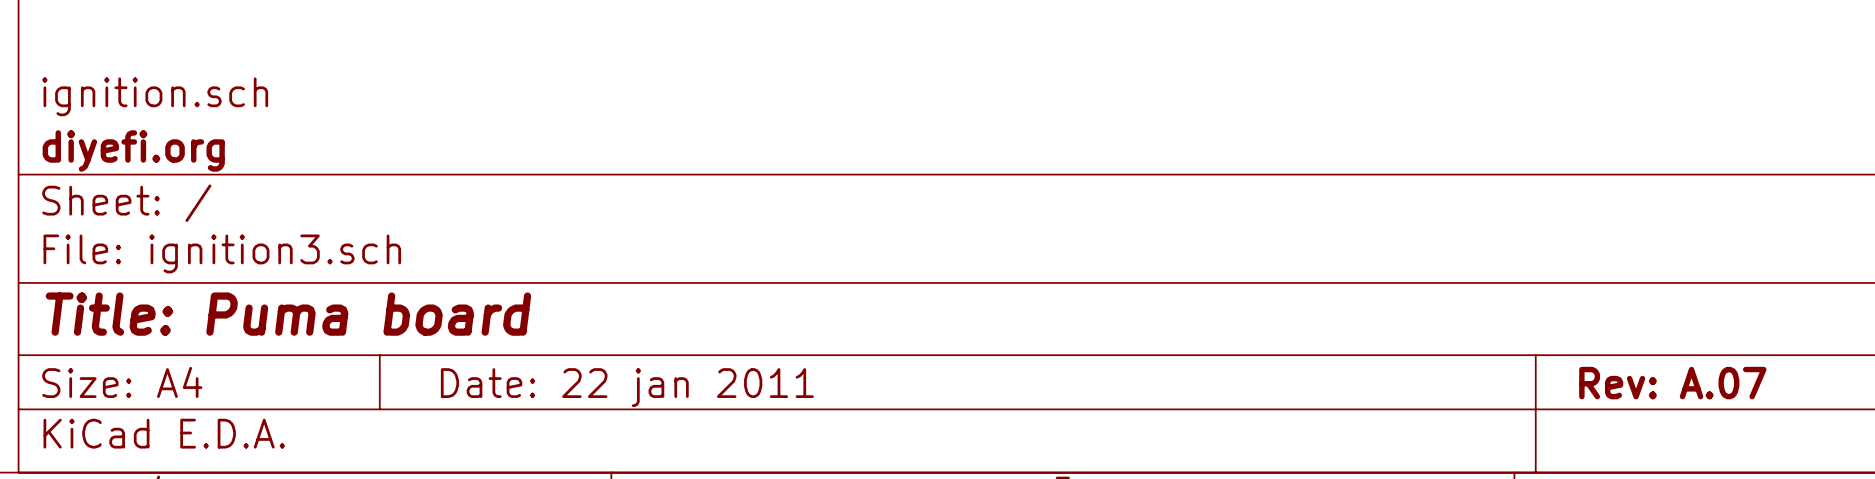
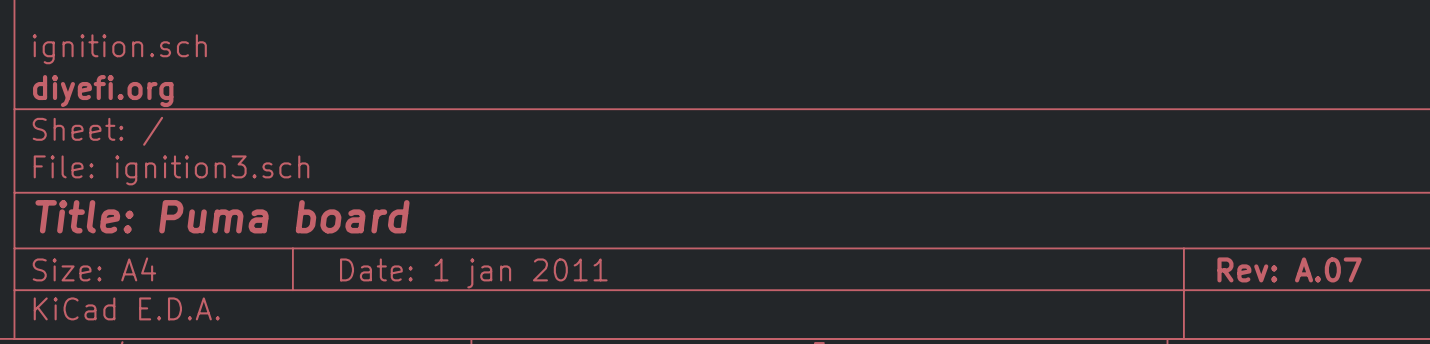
title block: Date: 22 jan 2011 (627, 387) -> Date: 1 jan 2011 (473, 273)

